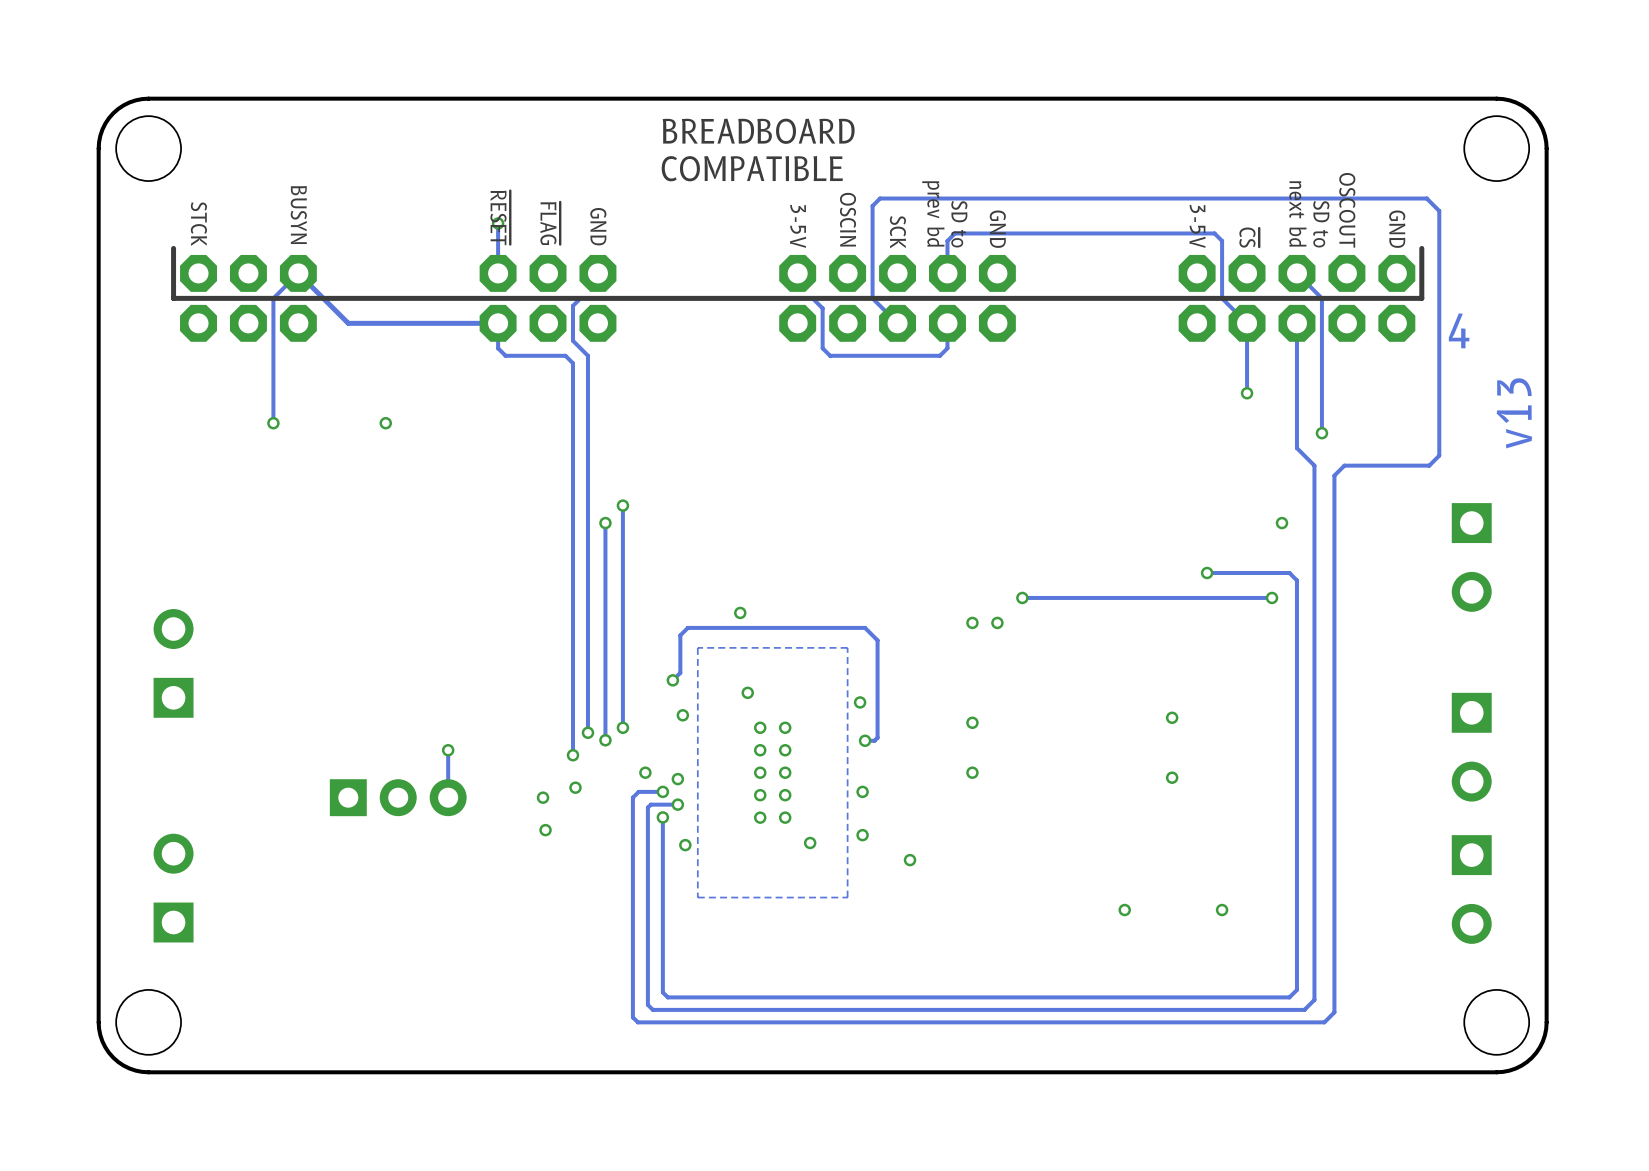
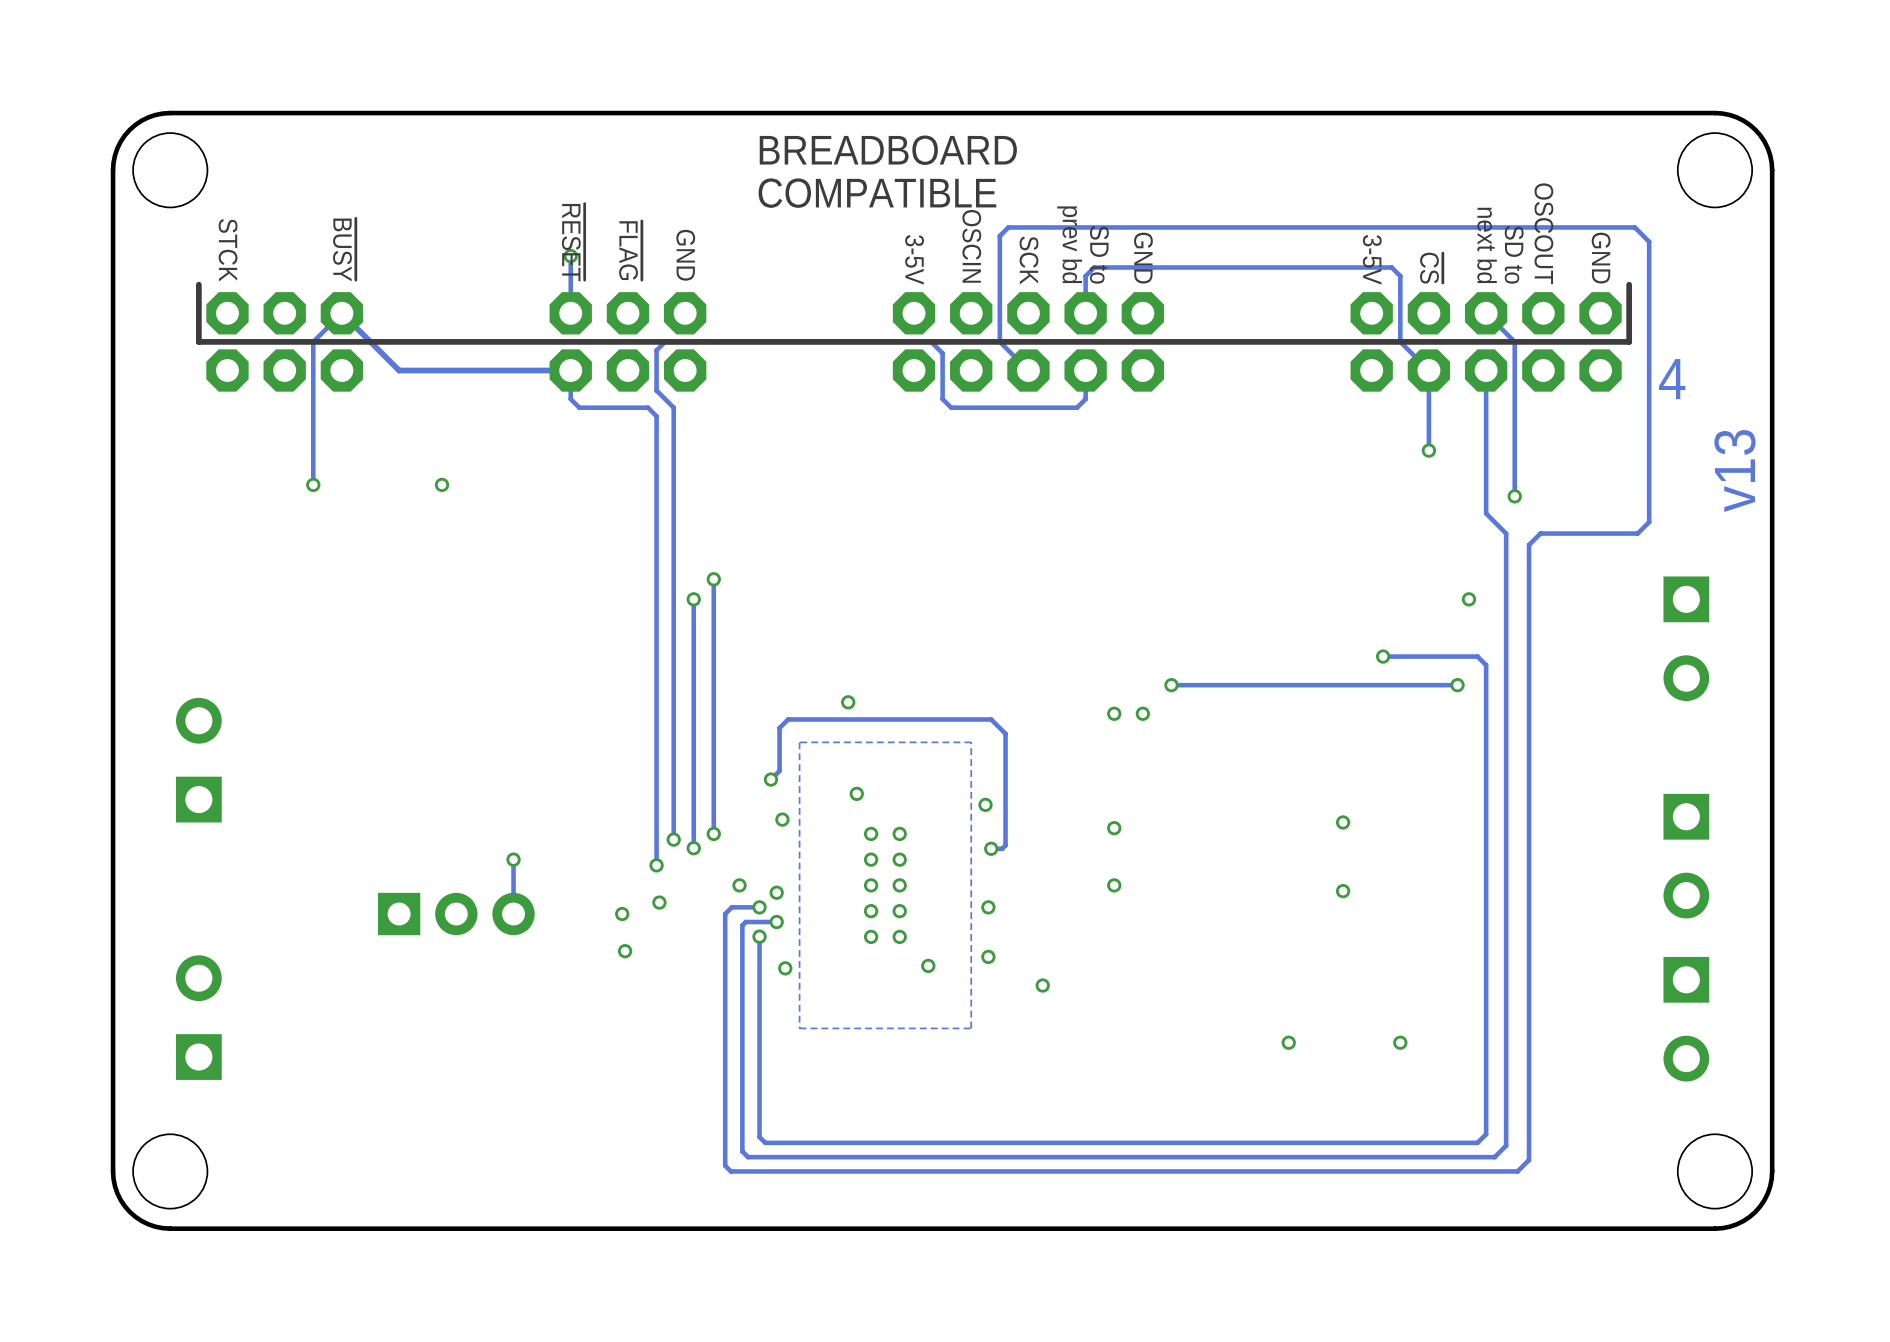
text: BUSYN (298, 214) -> ~{BUSY} (344, 249)

